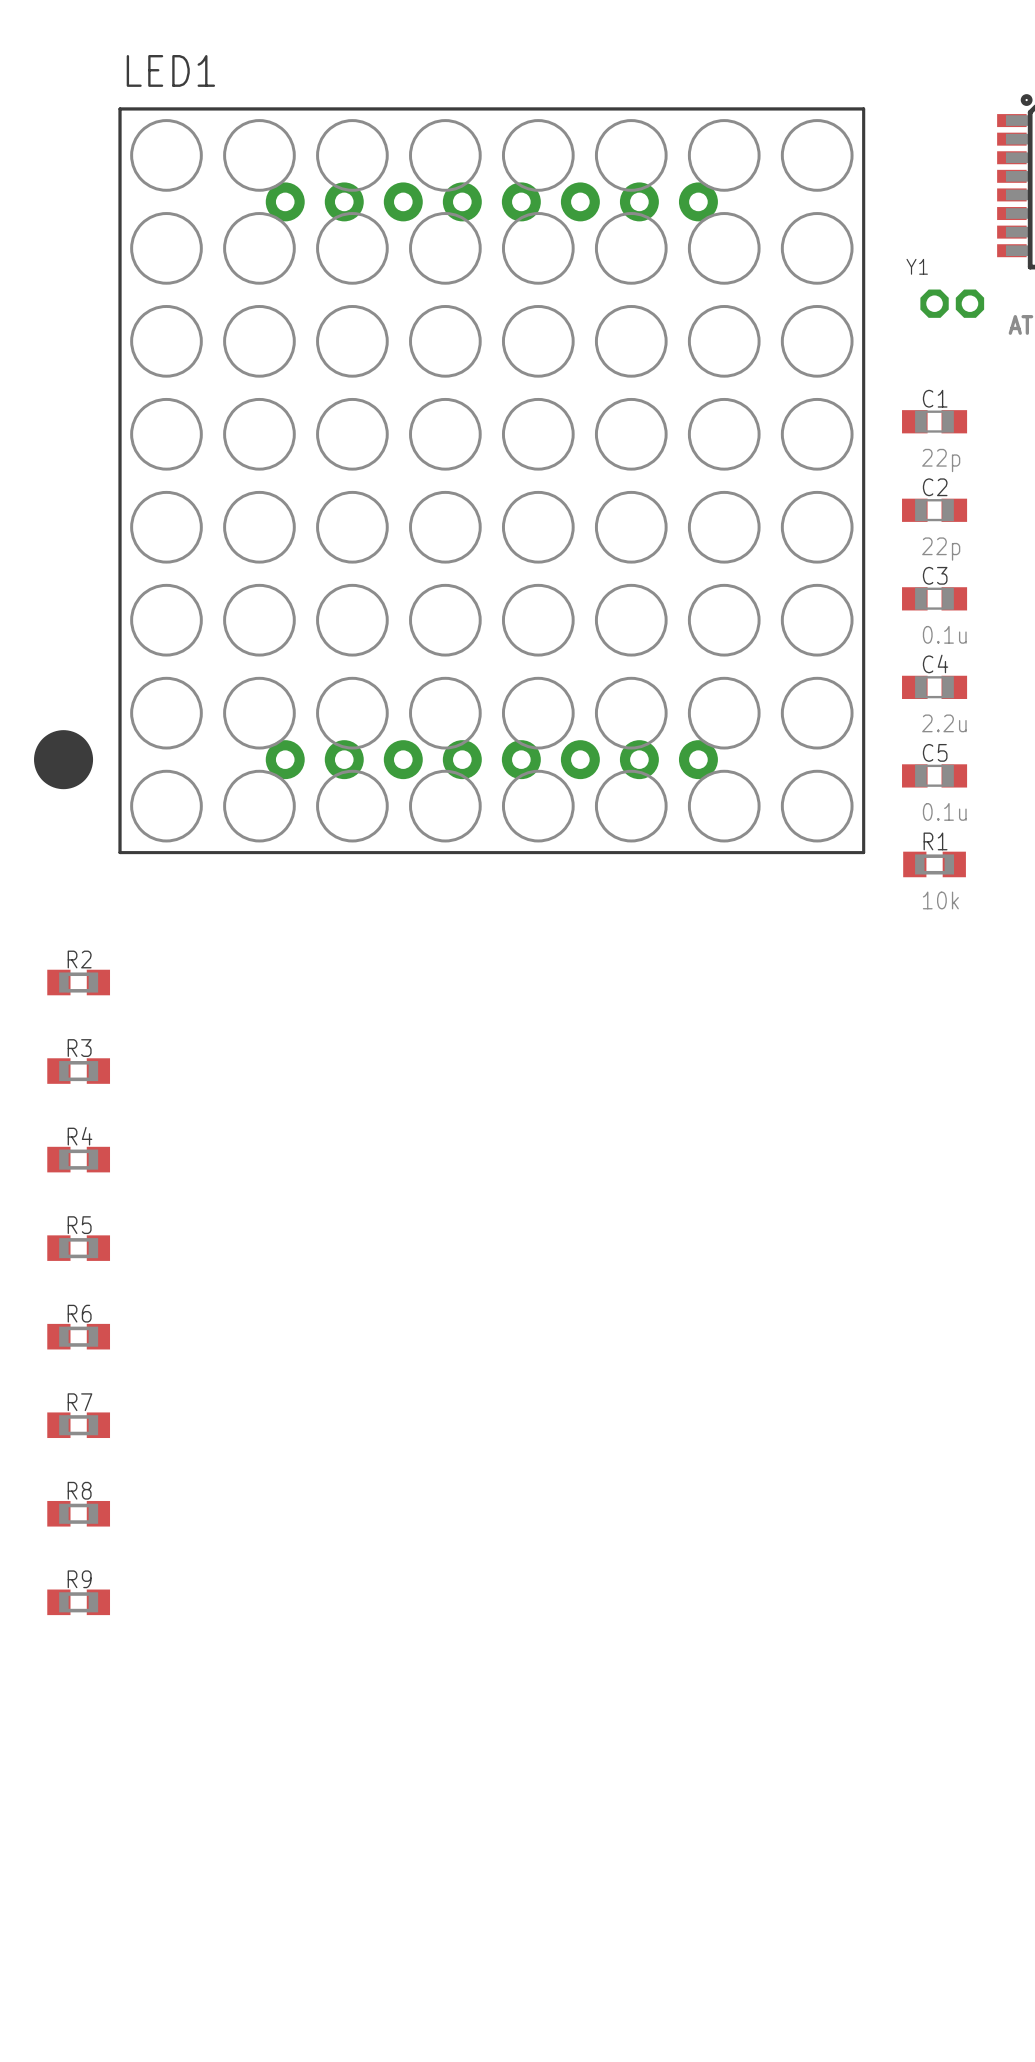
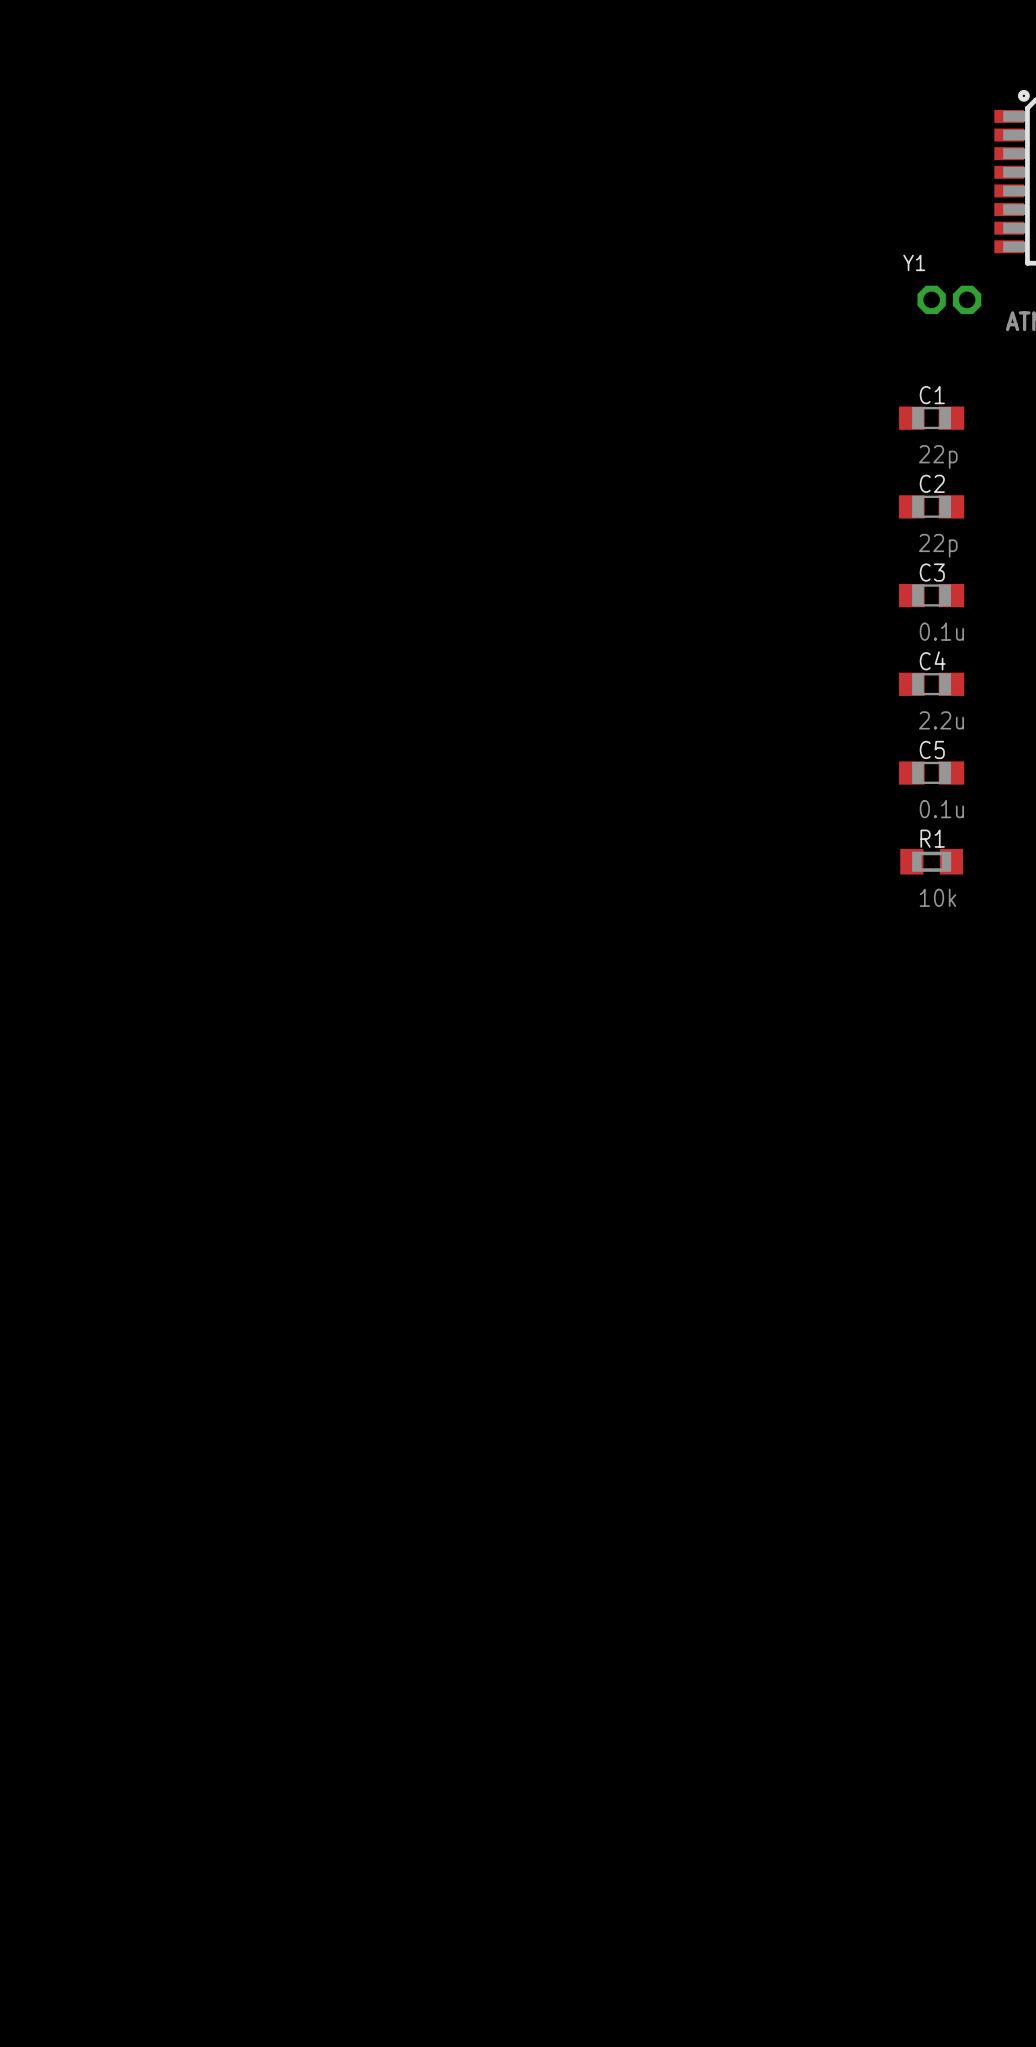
LED1: (449, 480) -> none
R2: (78, 982) -> none
R3: (78, 1071) -> none
R4: (78, 1159) -> none
R5: (78, 1248) -> none
R6: (78, 1336) -> none
R7: (78, 1425) -> none
R8: (78, 1513) -> none
R9: (78, 1602) -> none

